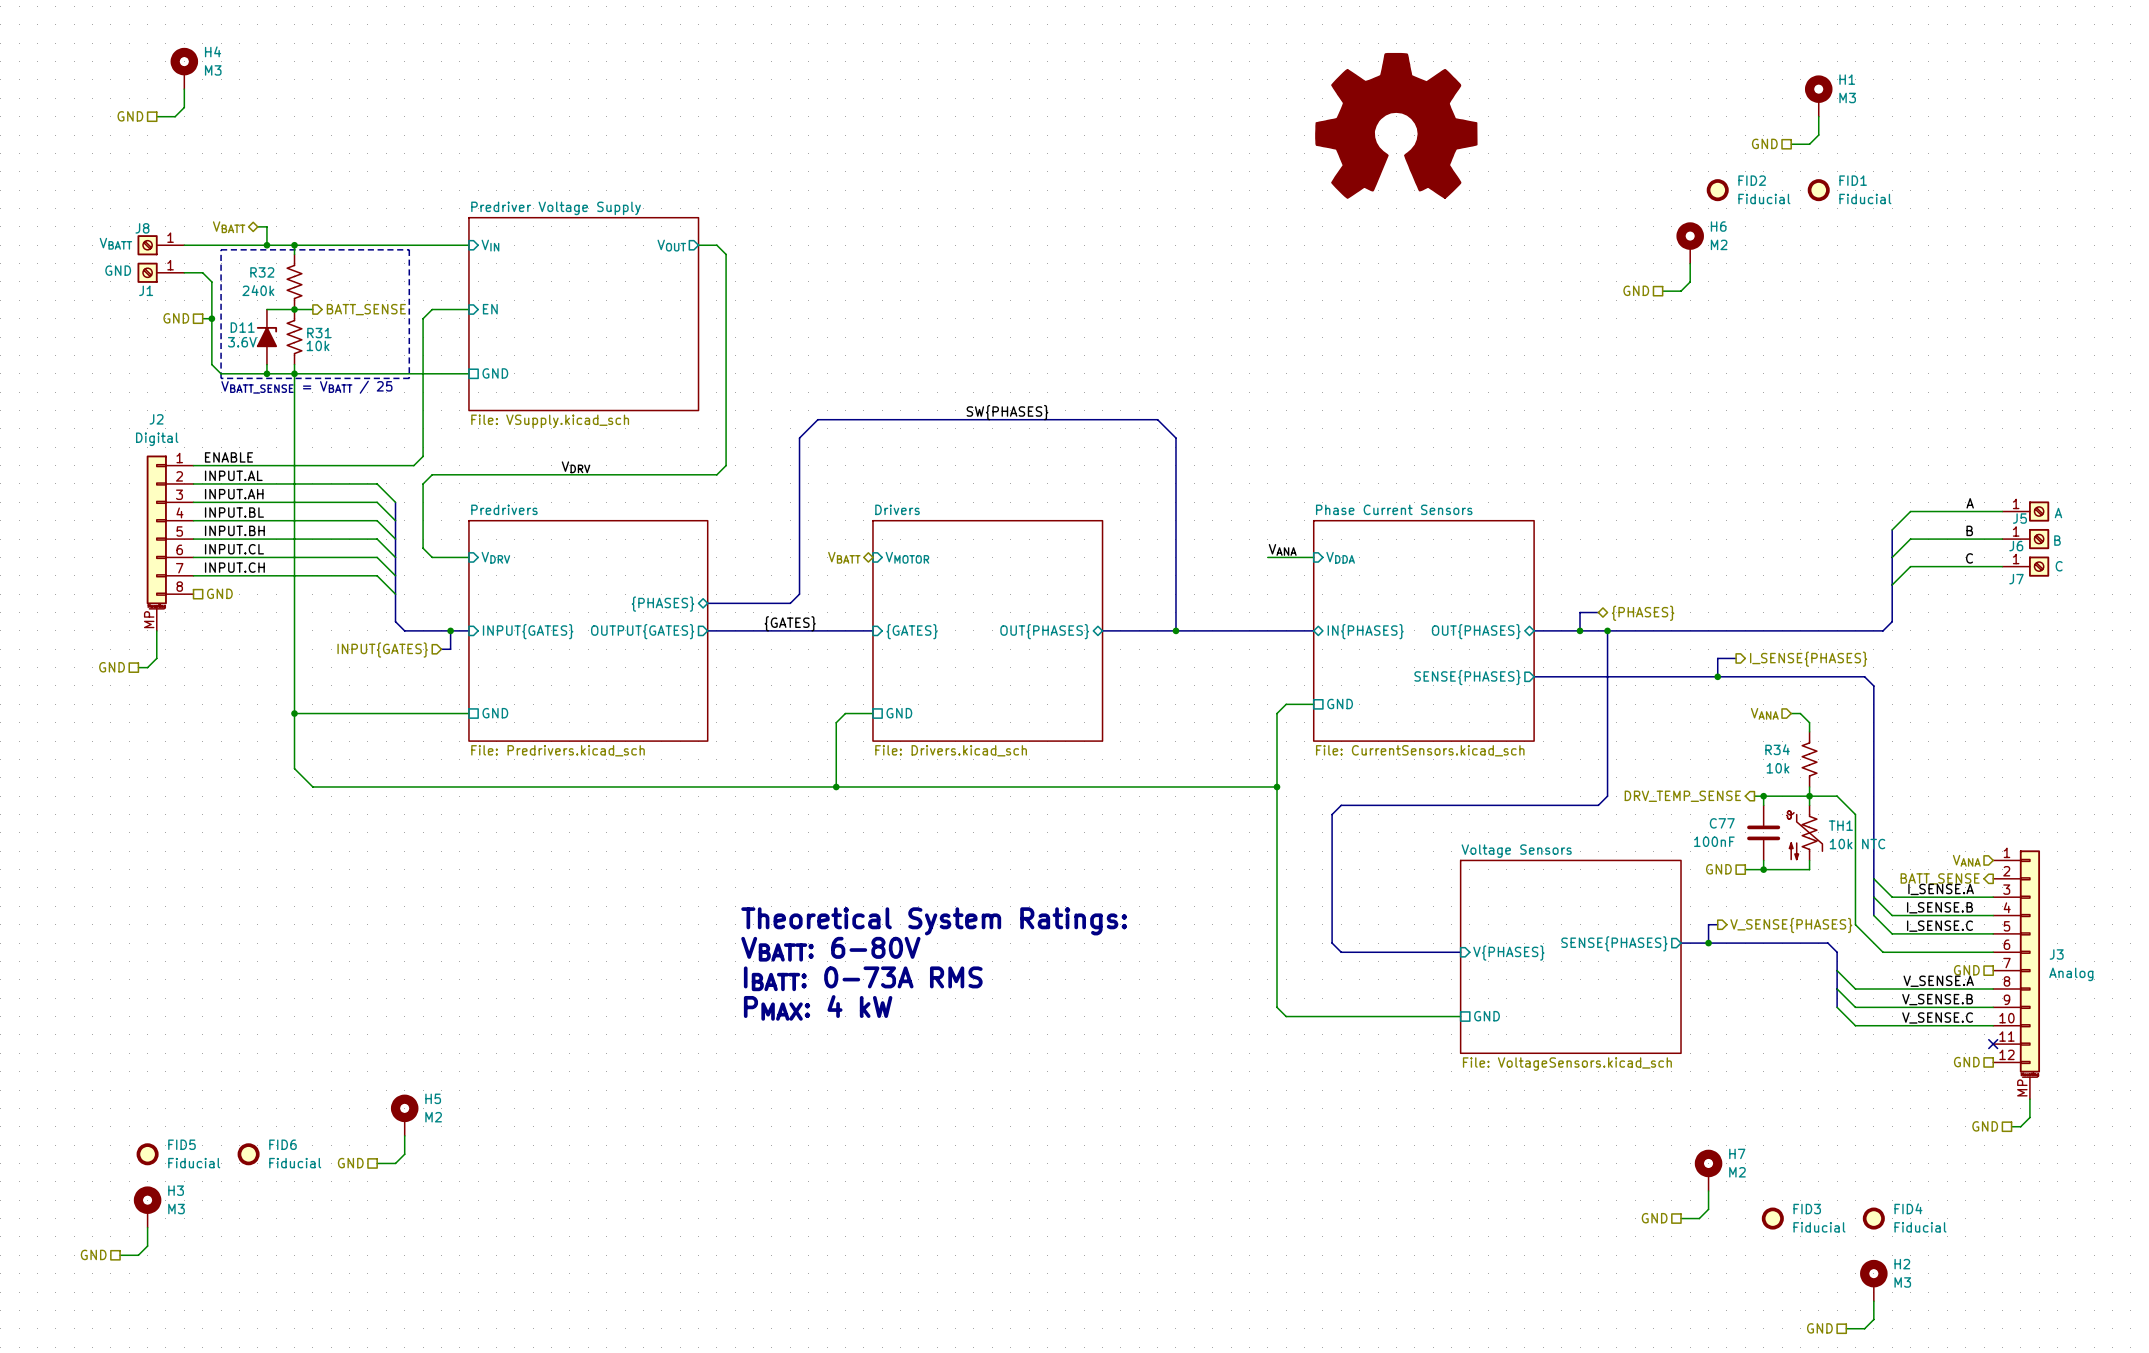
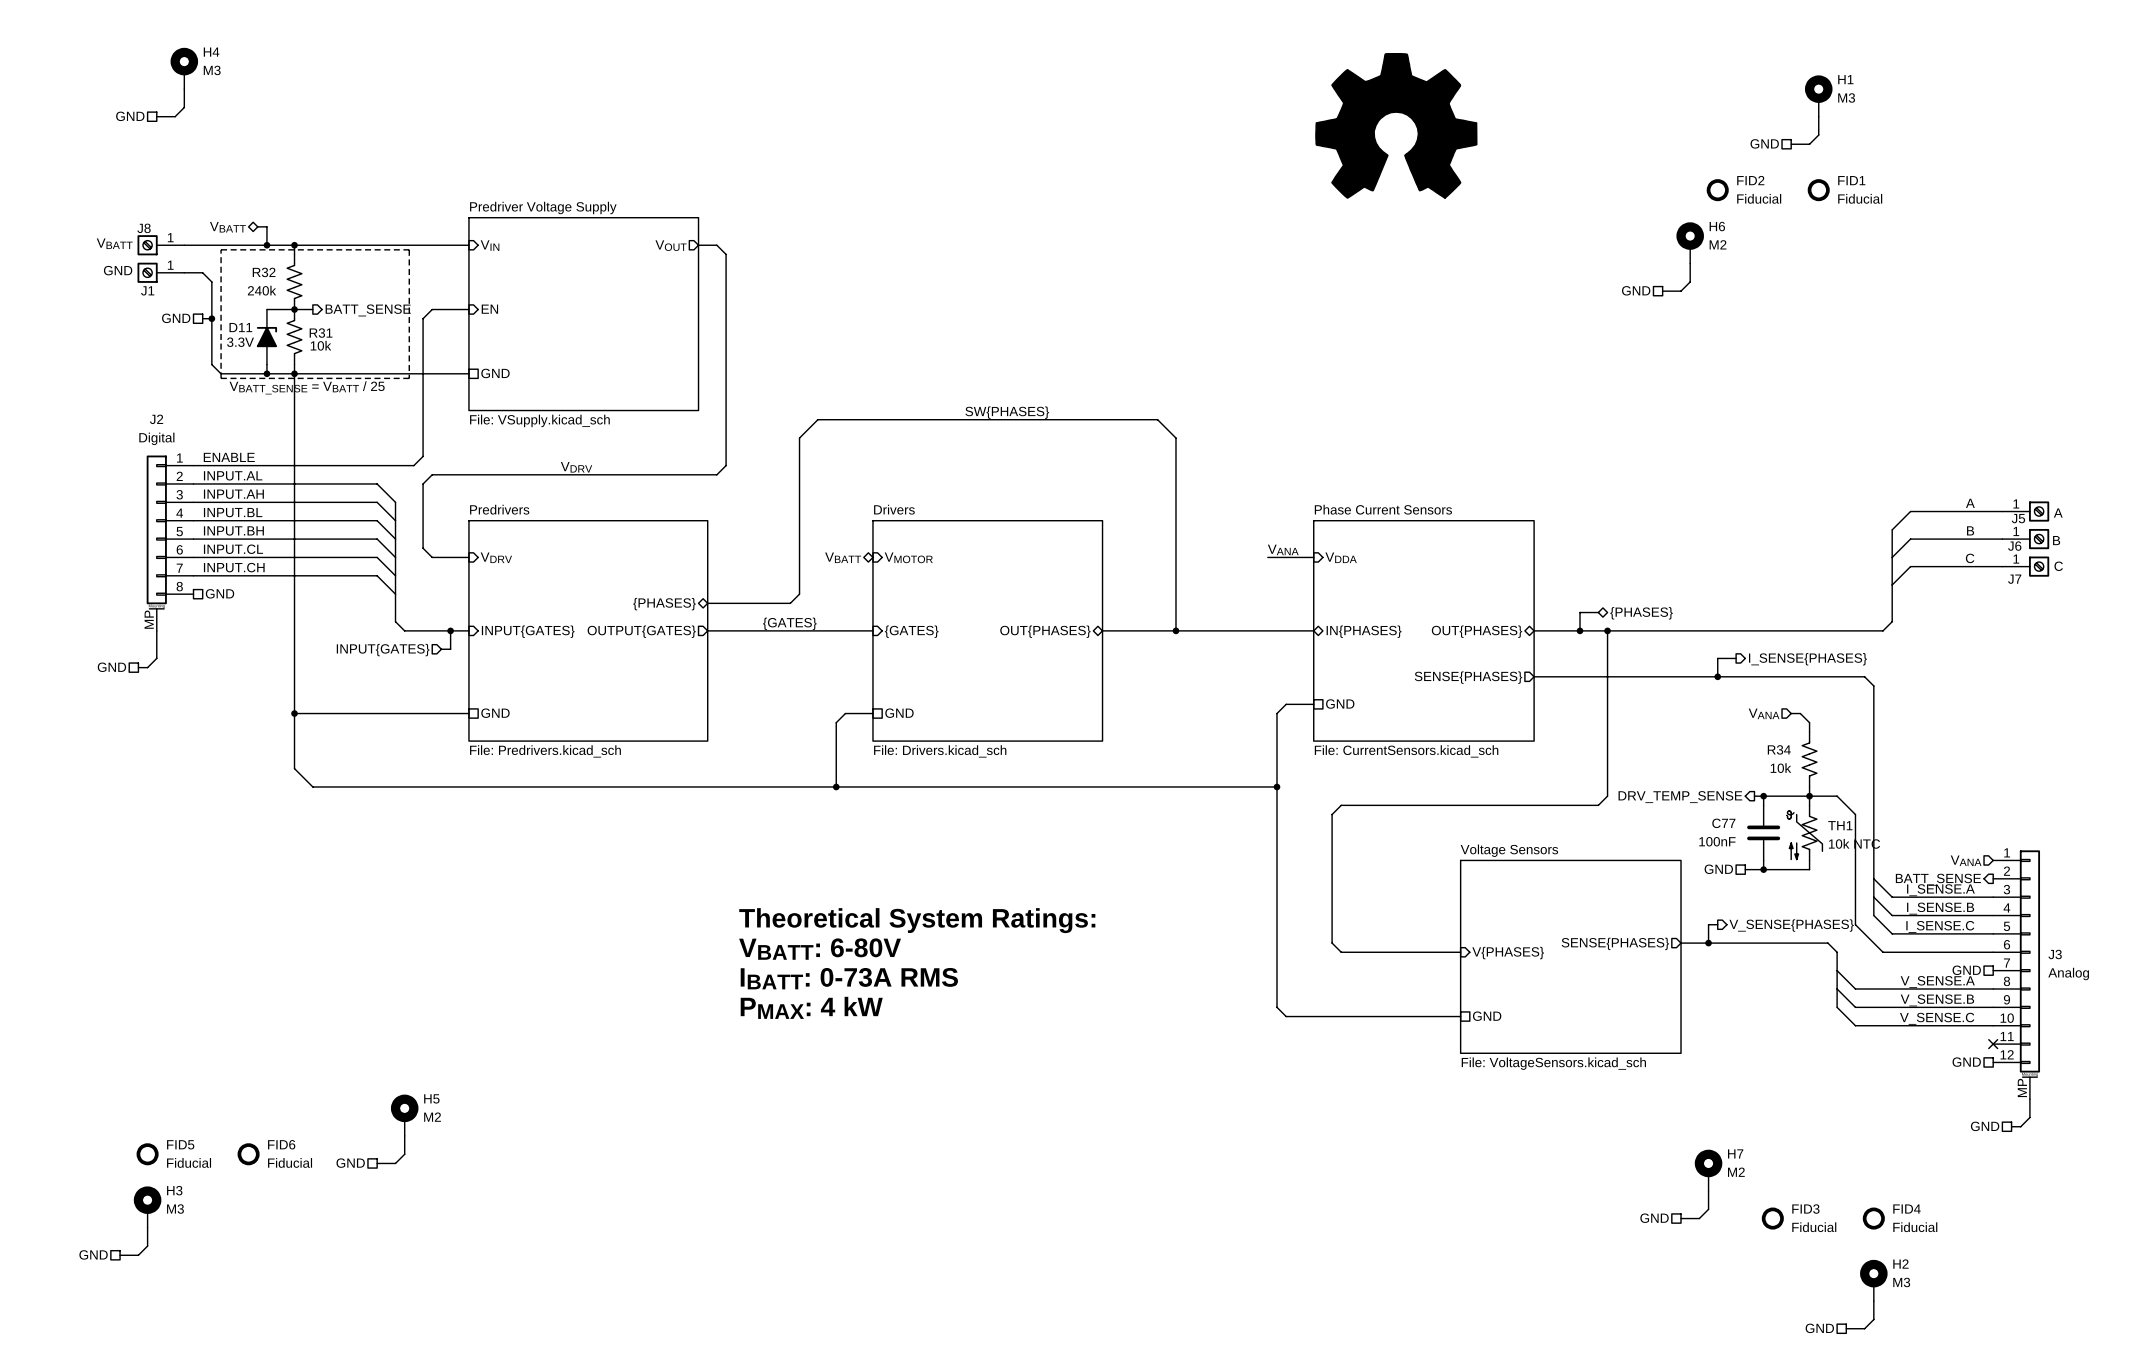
D11 value: 3.6V (242, 342) -> 3.3V (240, 342)

